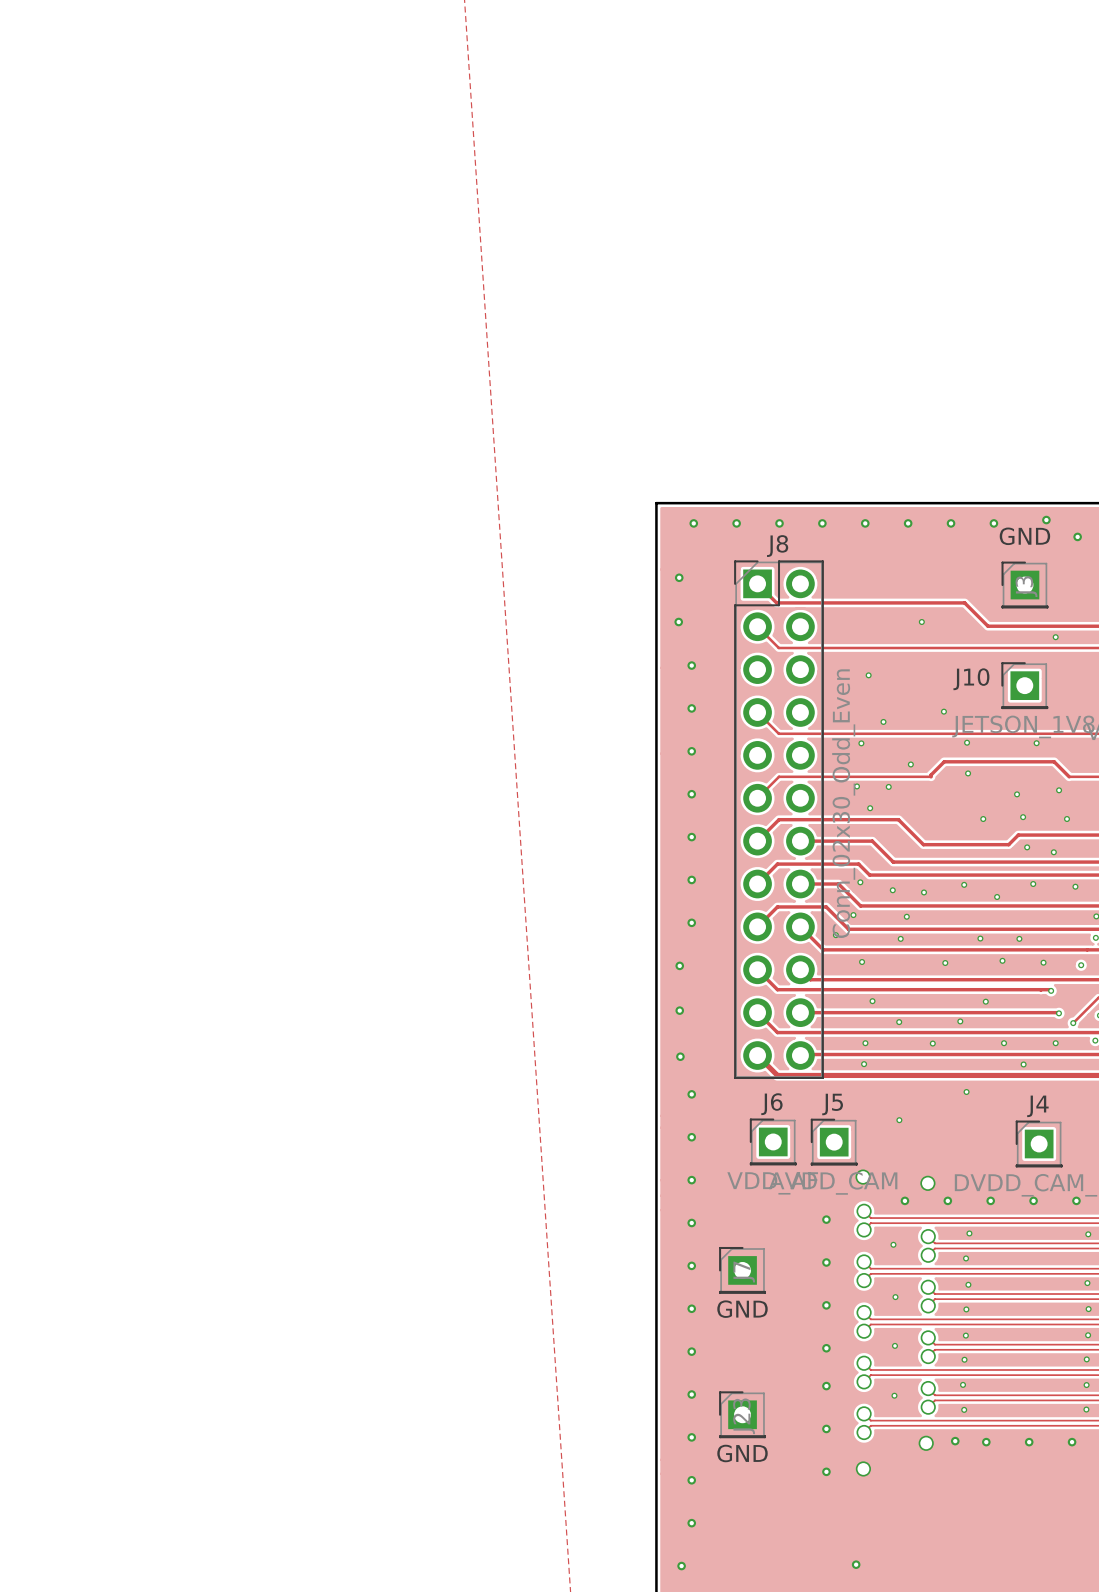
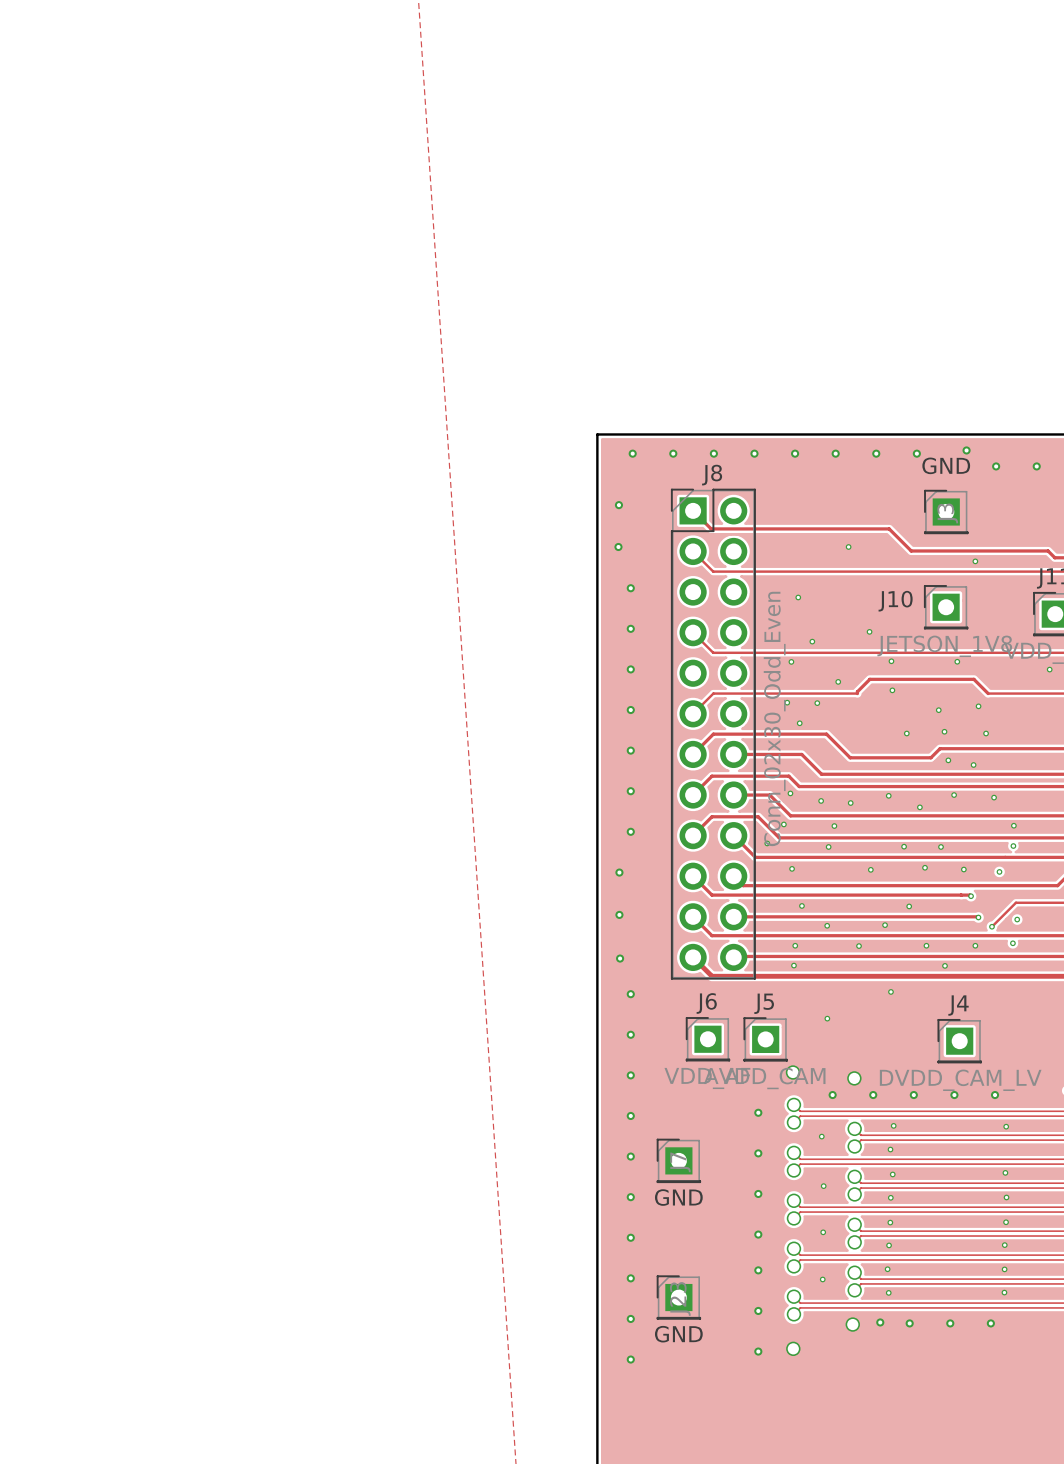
via: (691, 1523) -> none
via: (856, 1564) -> none
via: (681, 1566) -> none

